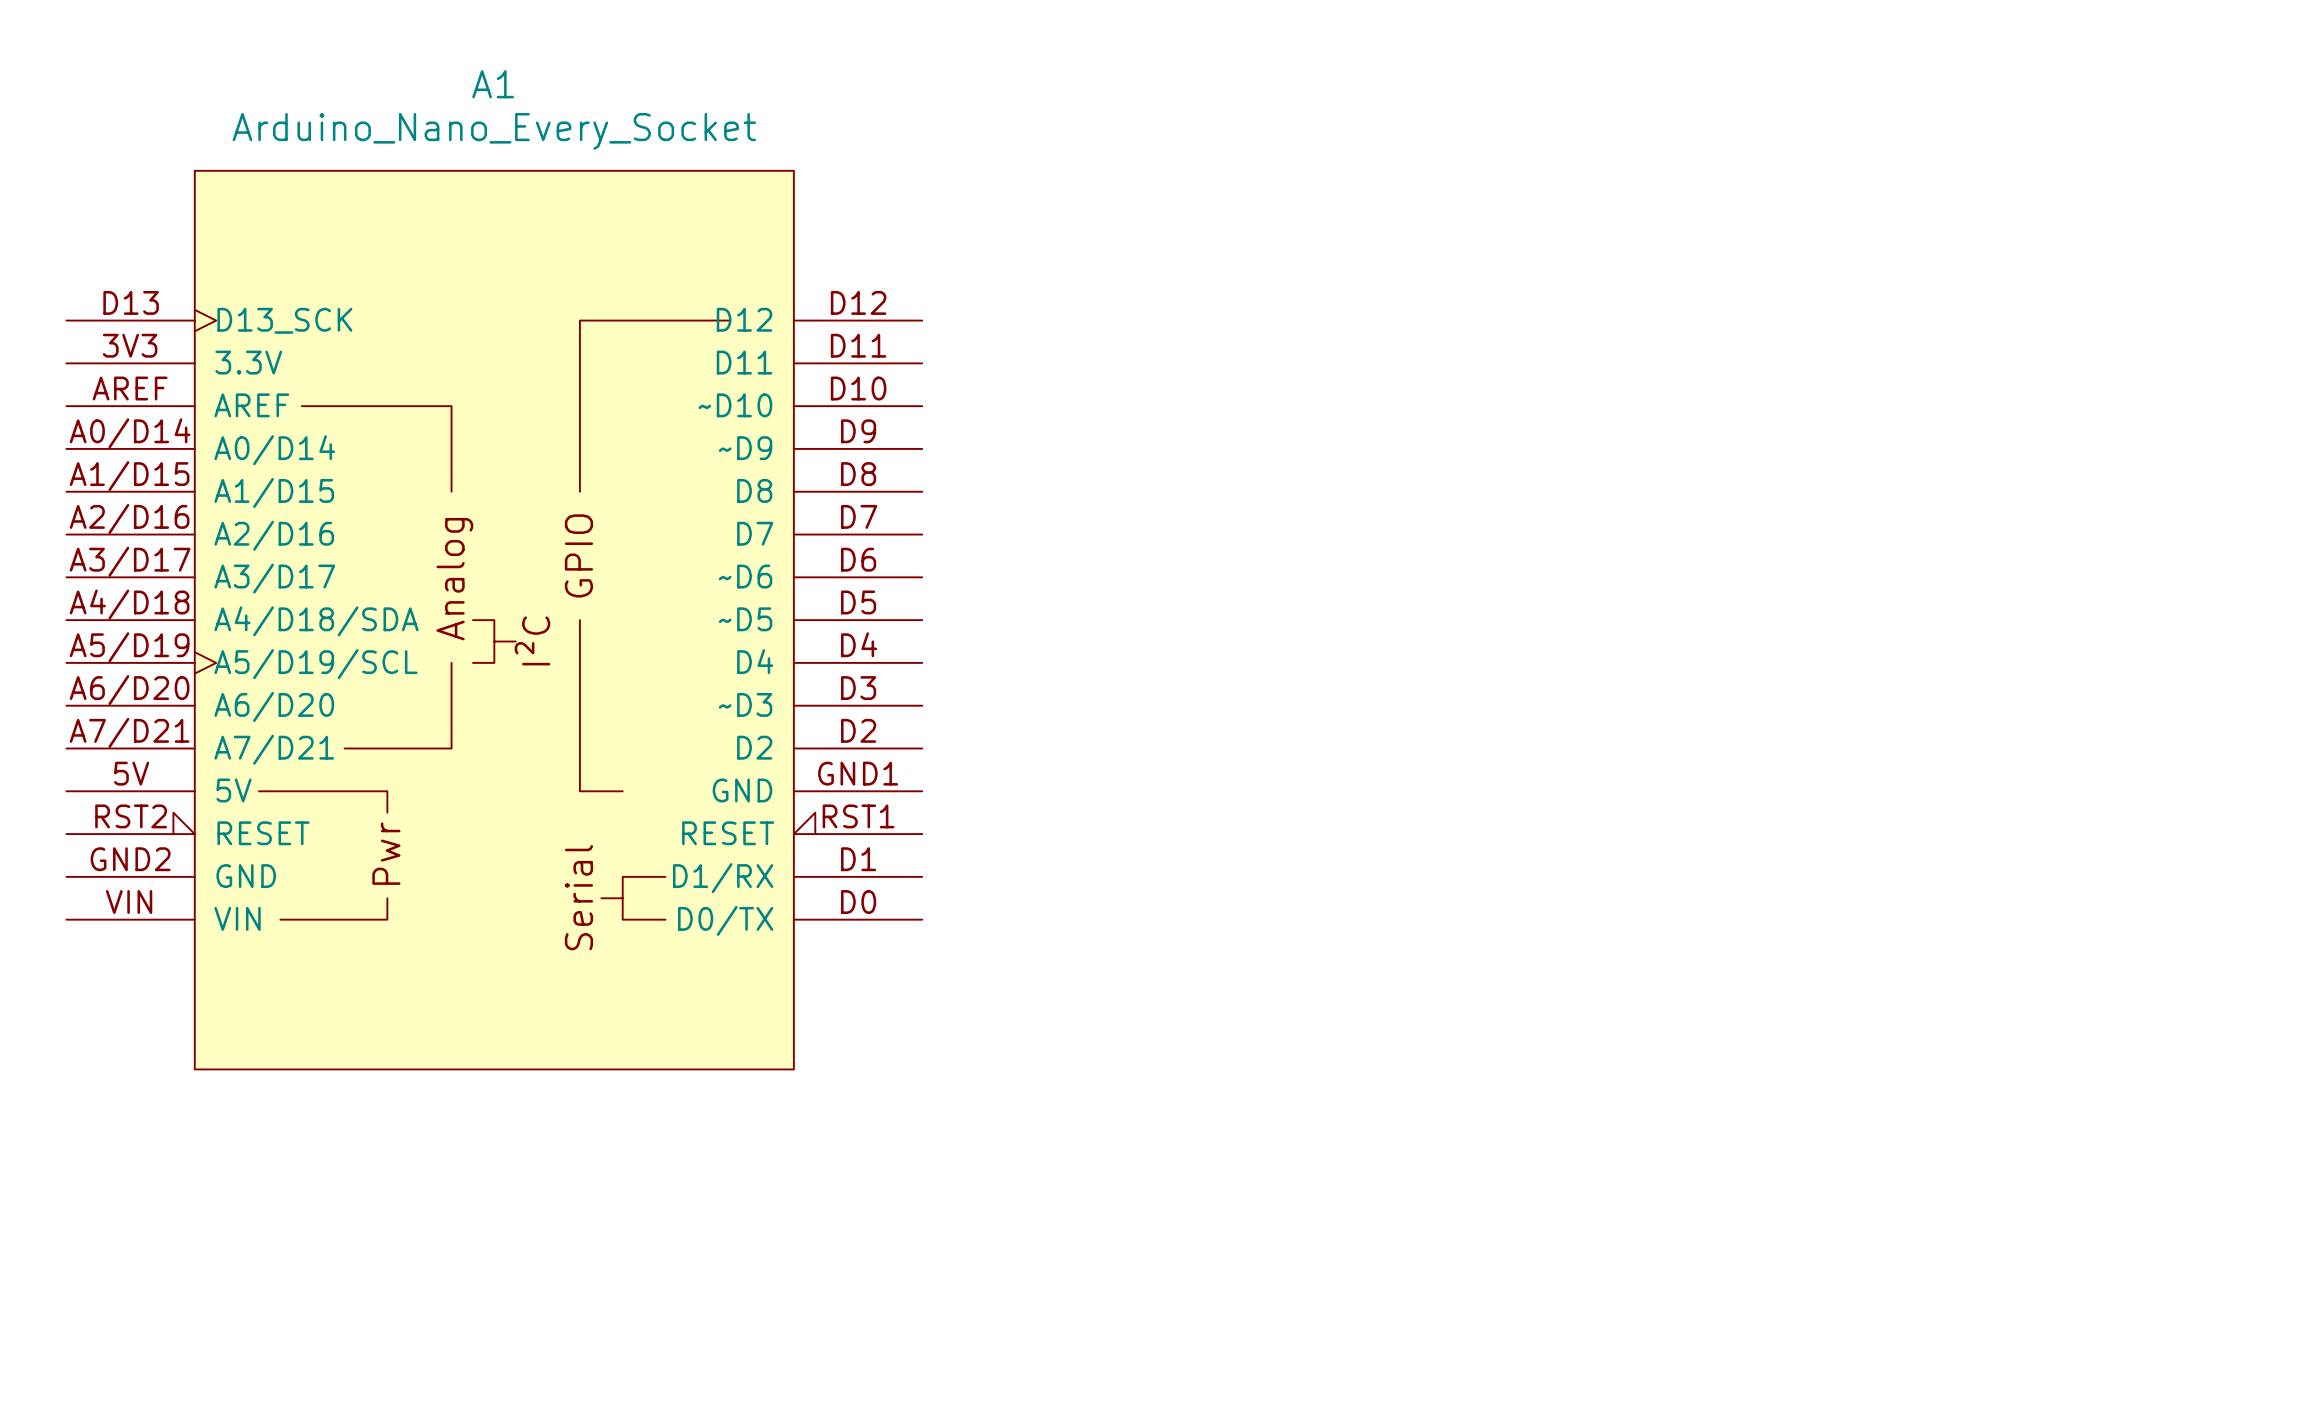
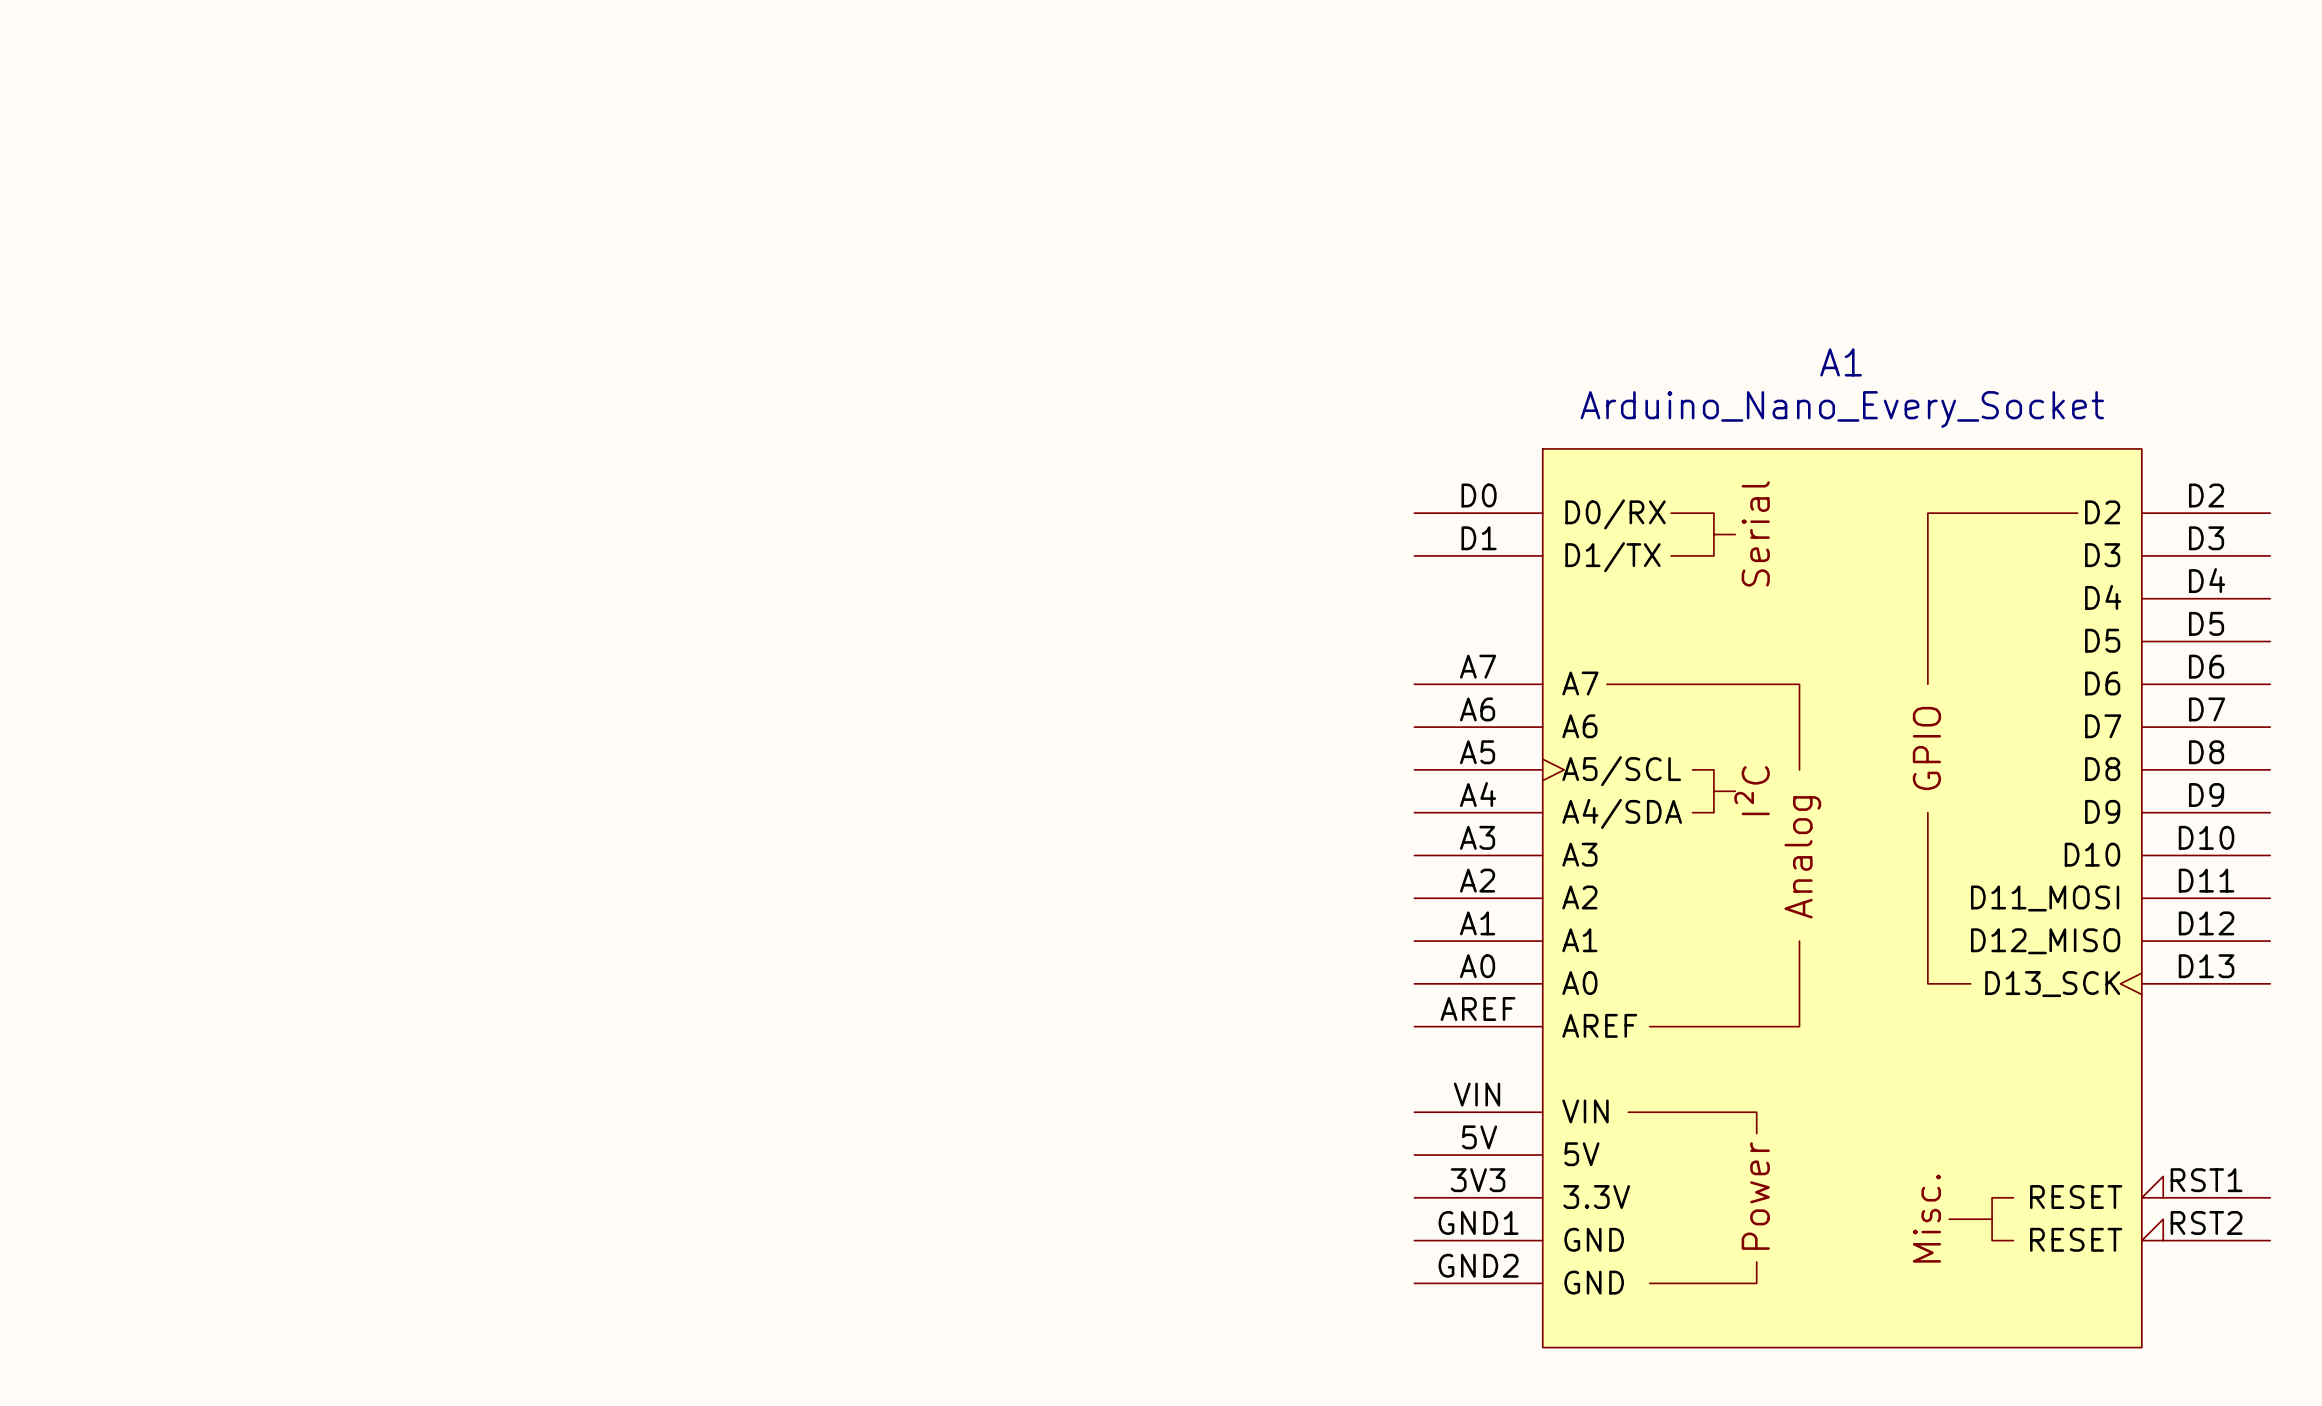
A1 symbol: [66, 170, 923, 1070] -> [1414, 448, 2271, 1348]

